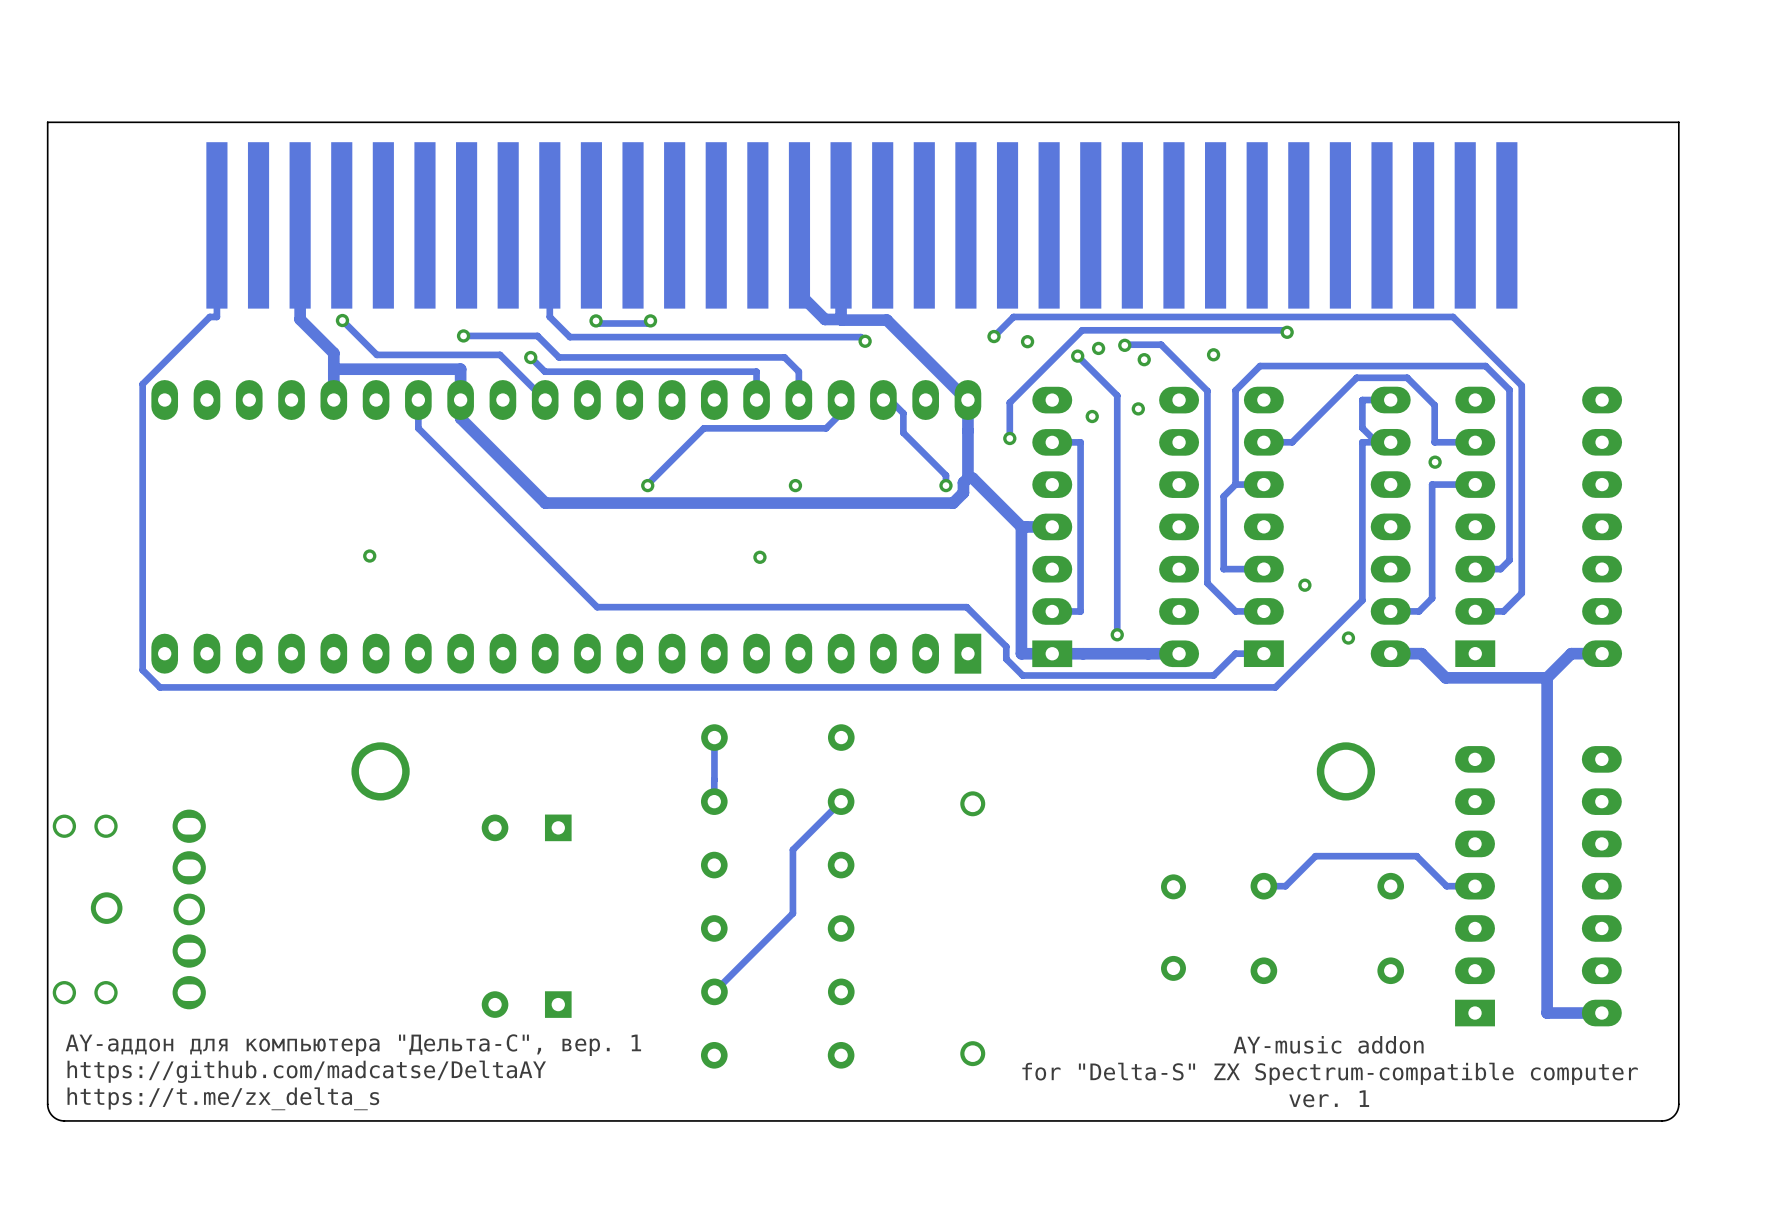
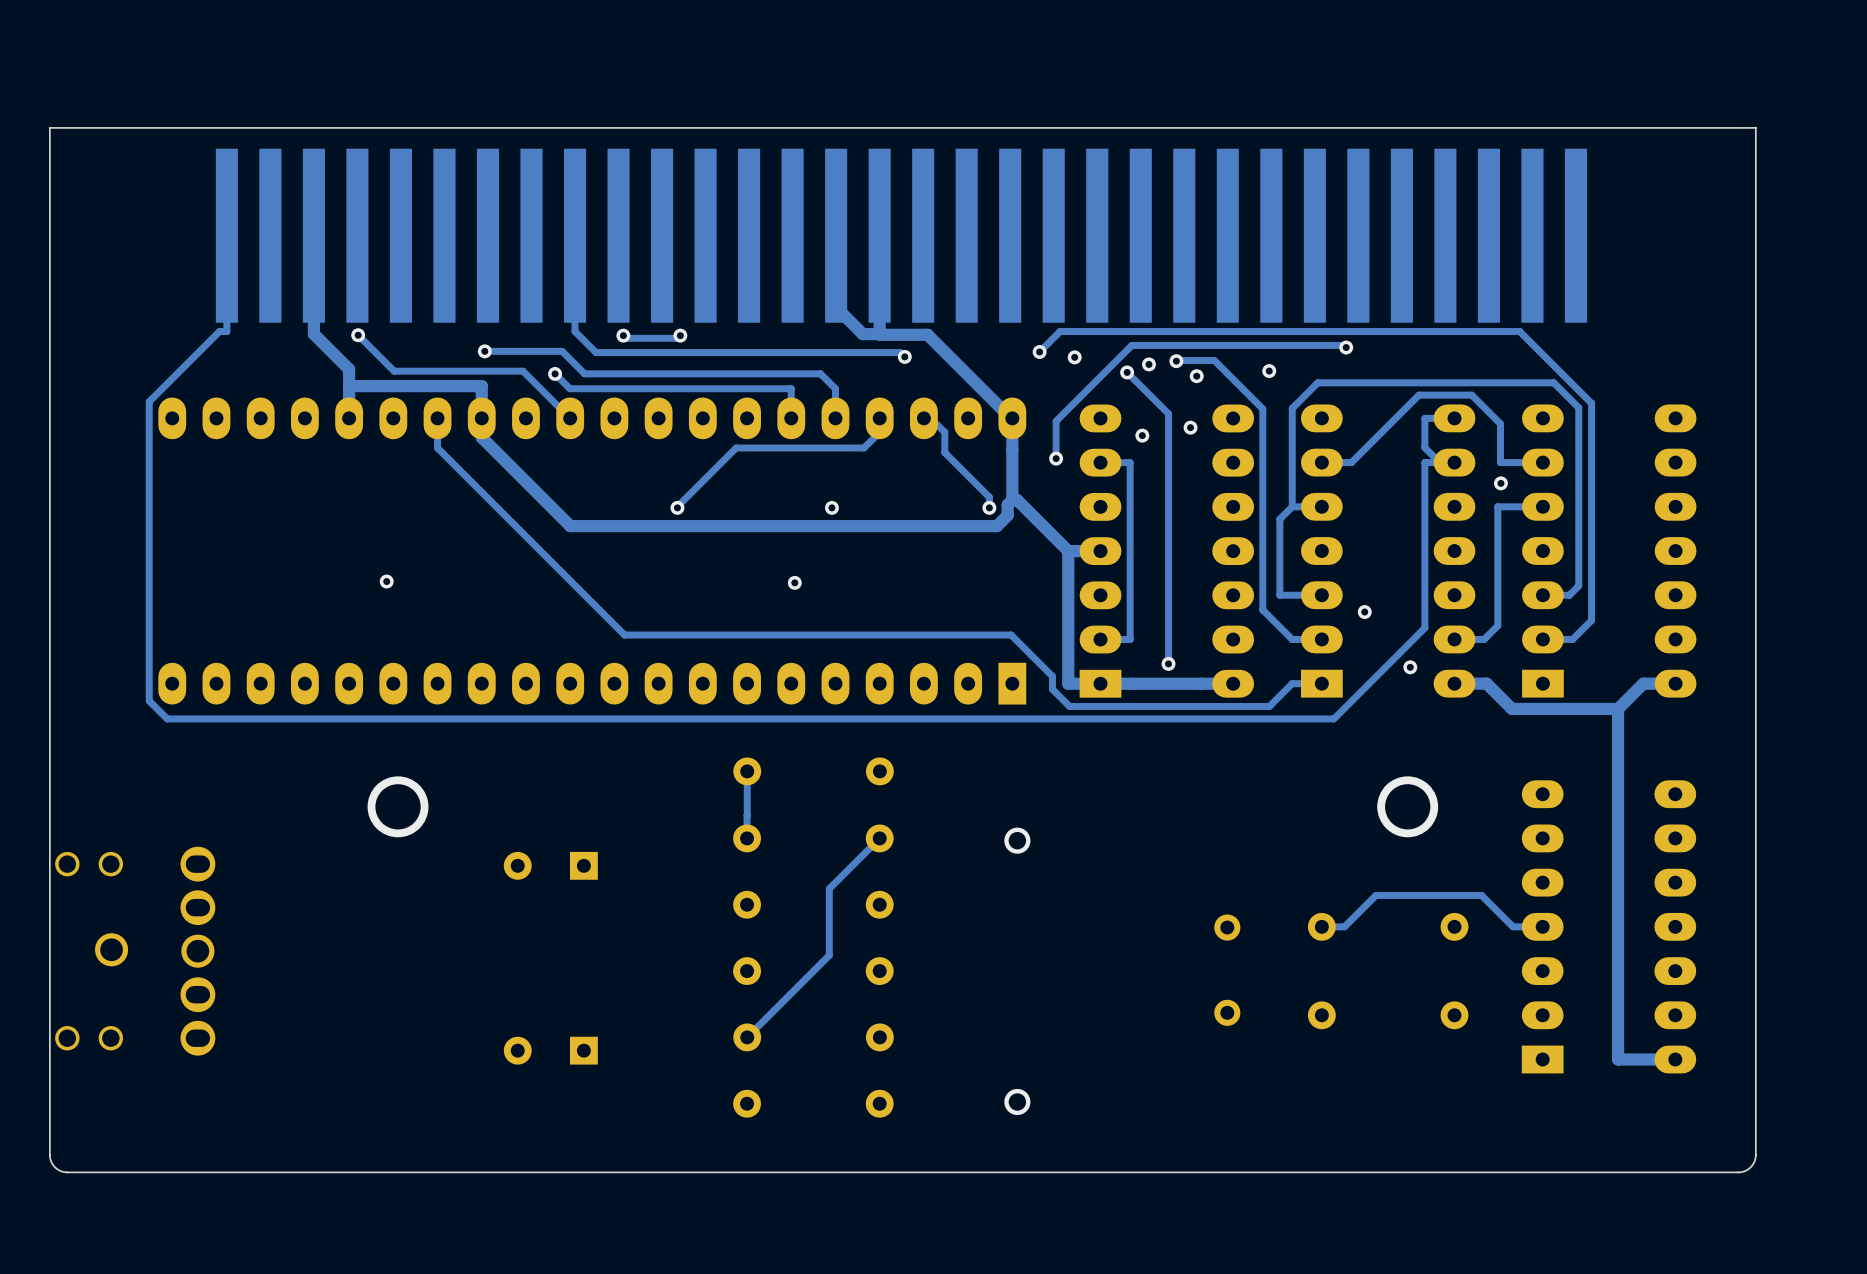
text: AY-music addon (1328, 1044) -> none
text: AY-аддон для компьютера "Дельта-С", вер. 1 (353, 1045) -> none
text: https://github.com/madcatse/DeltaAY (306, 1071) -> none
text: for "Delta-S" ZX Spectrum-compatible computer (1330, 1073) -> none
text: https://t.me/zx_delta_s (223, 1098) -> none
text: ver. 1 (1329, 1098) -> none

